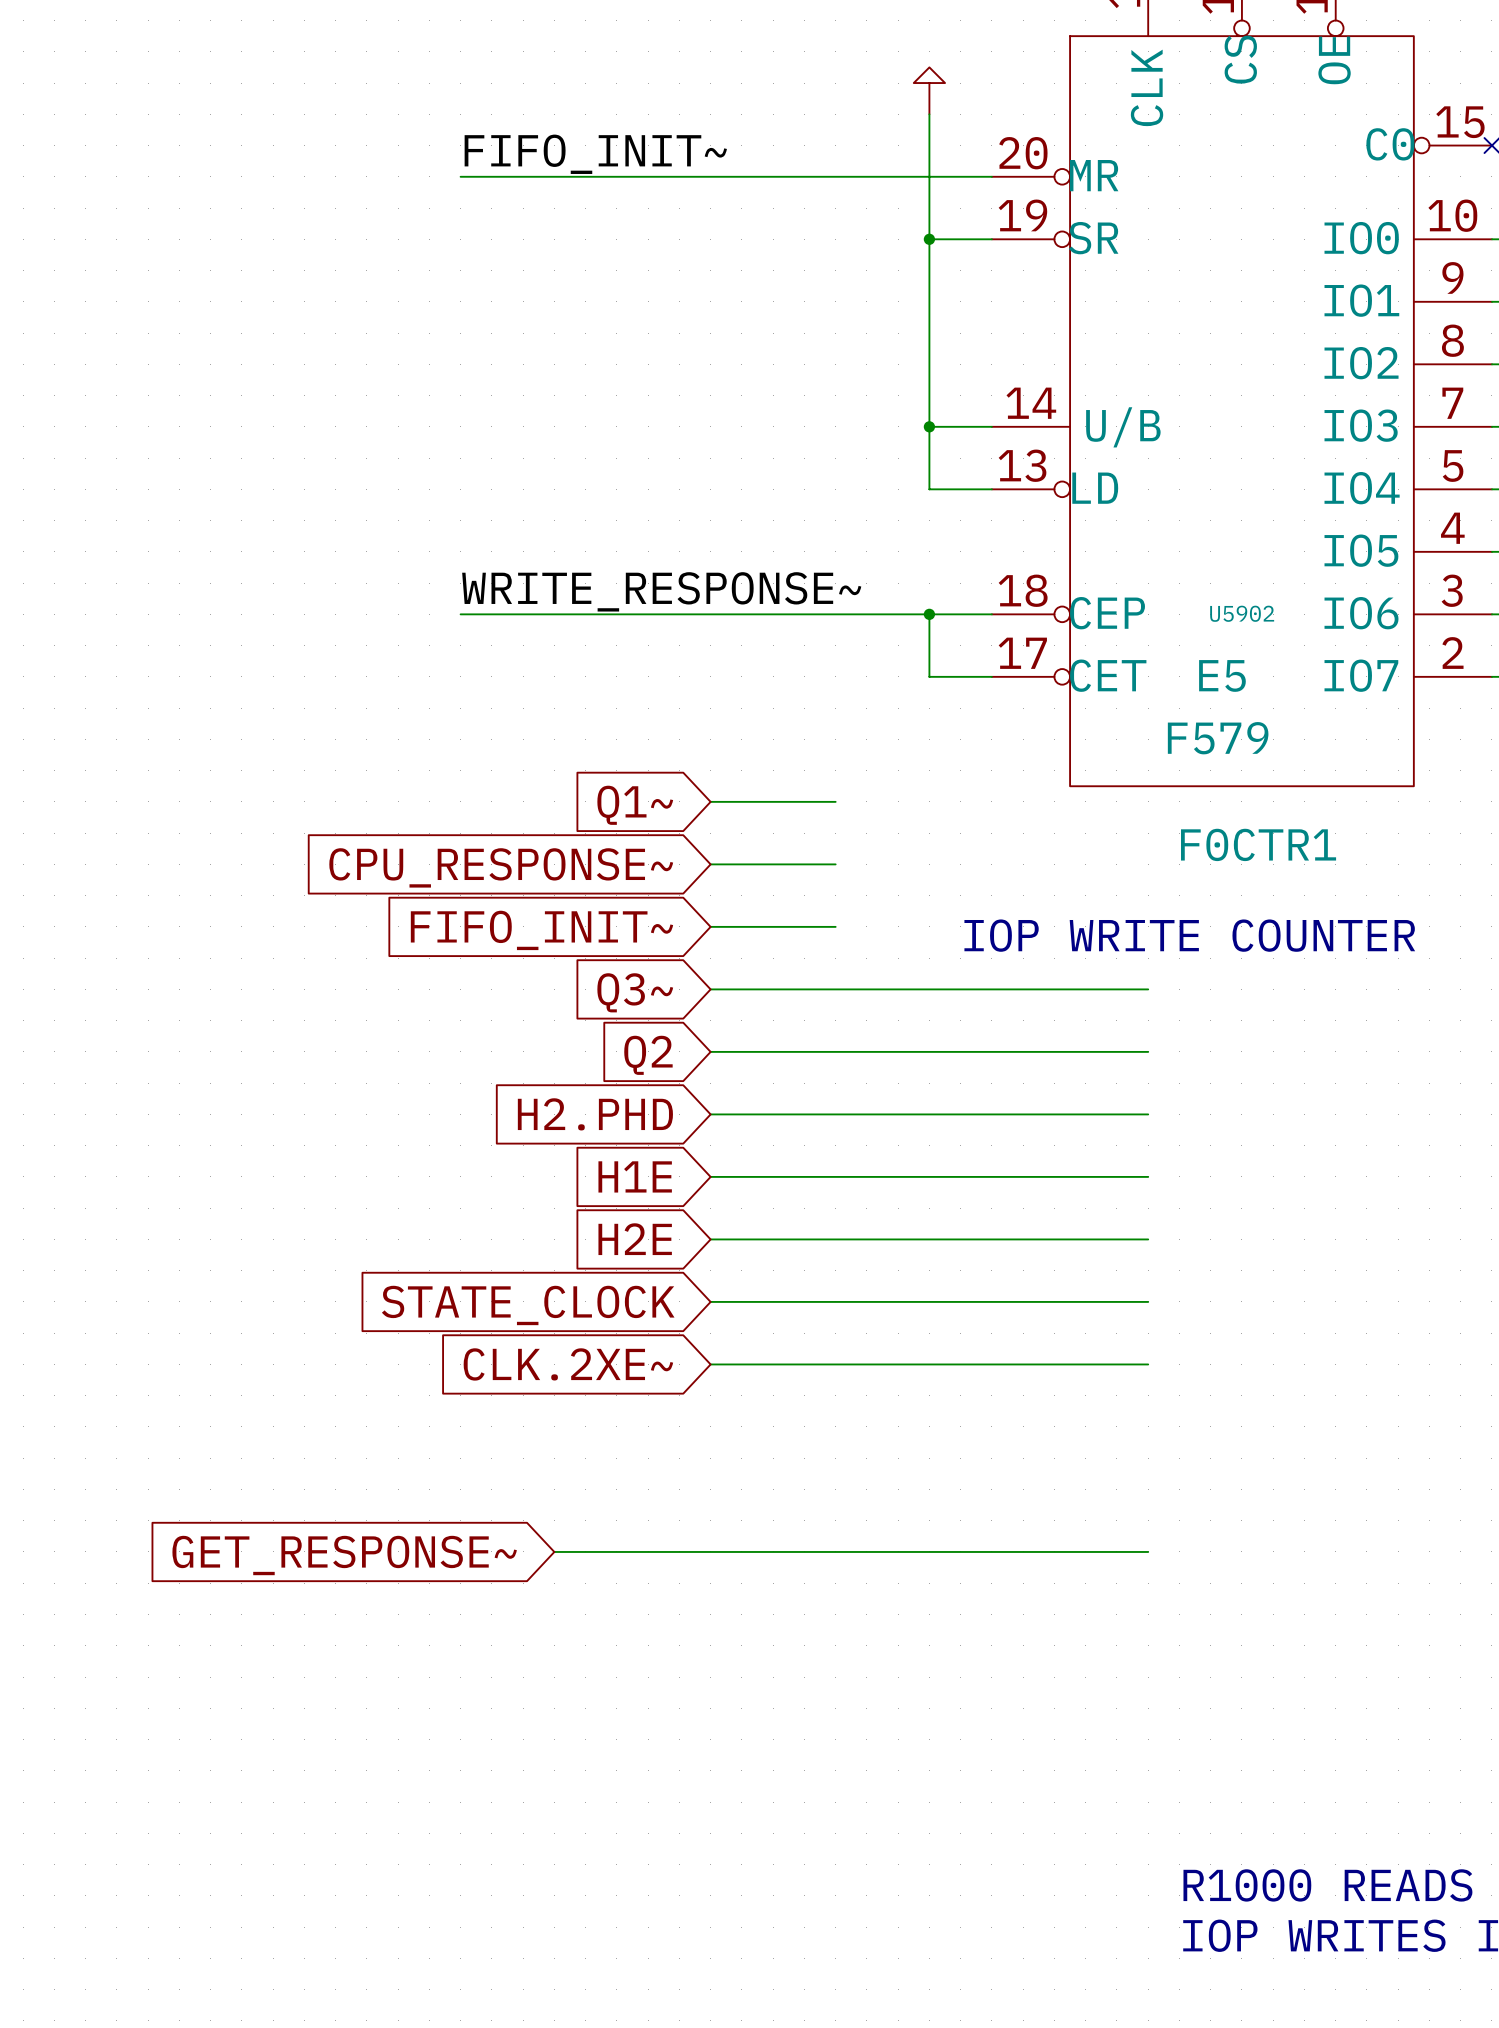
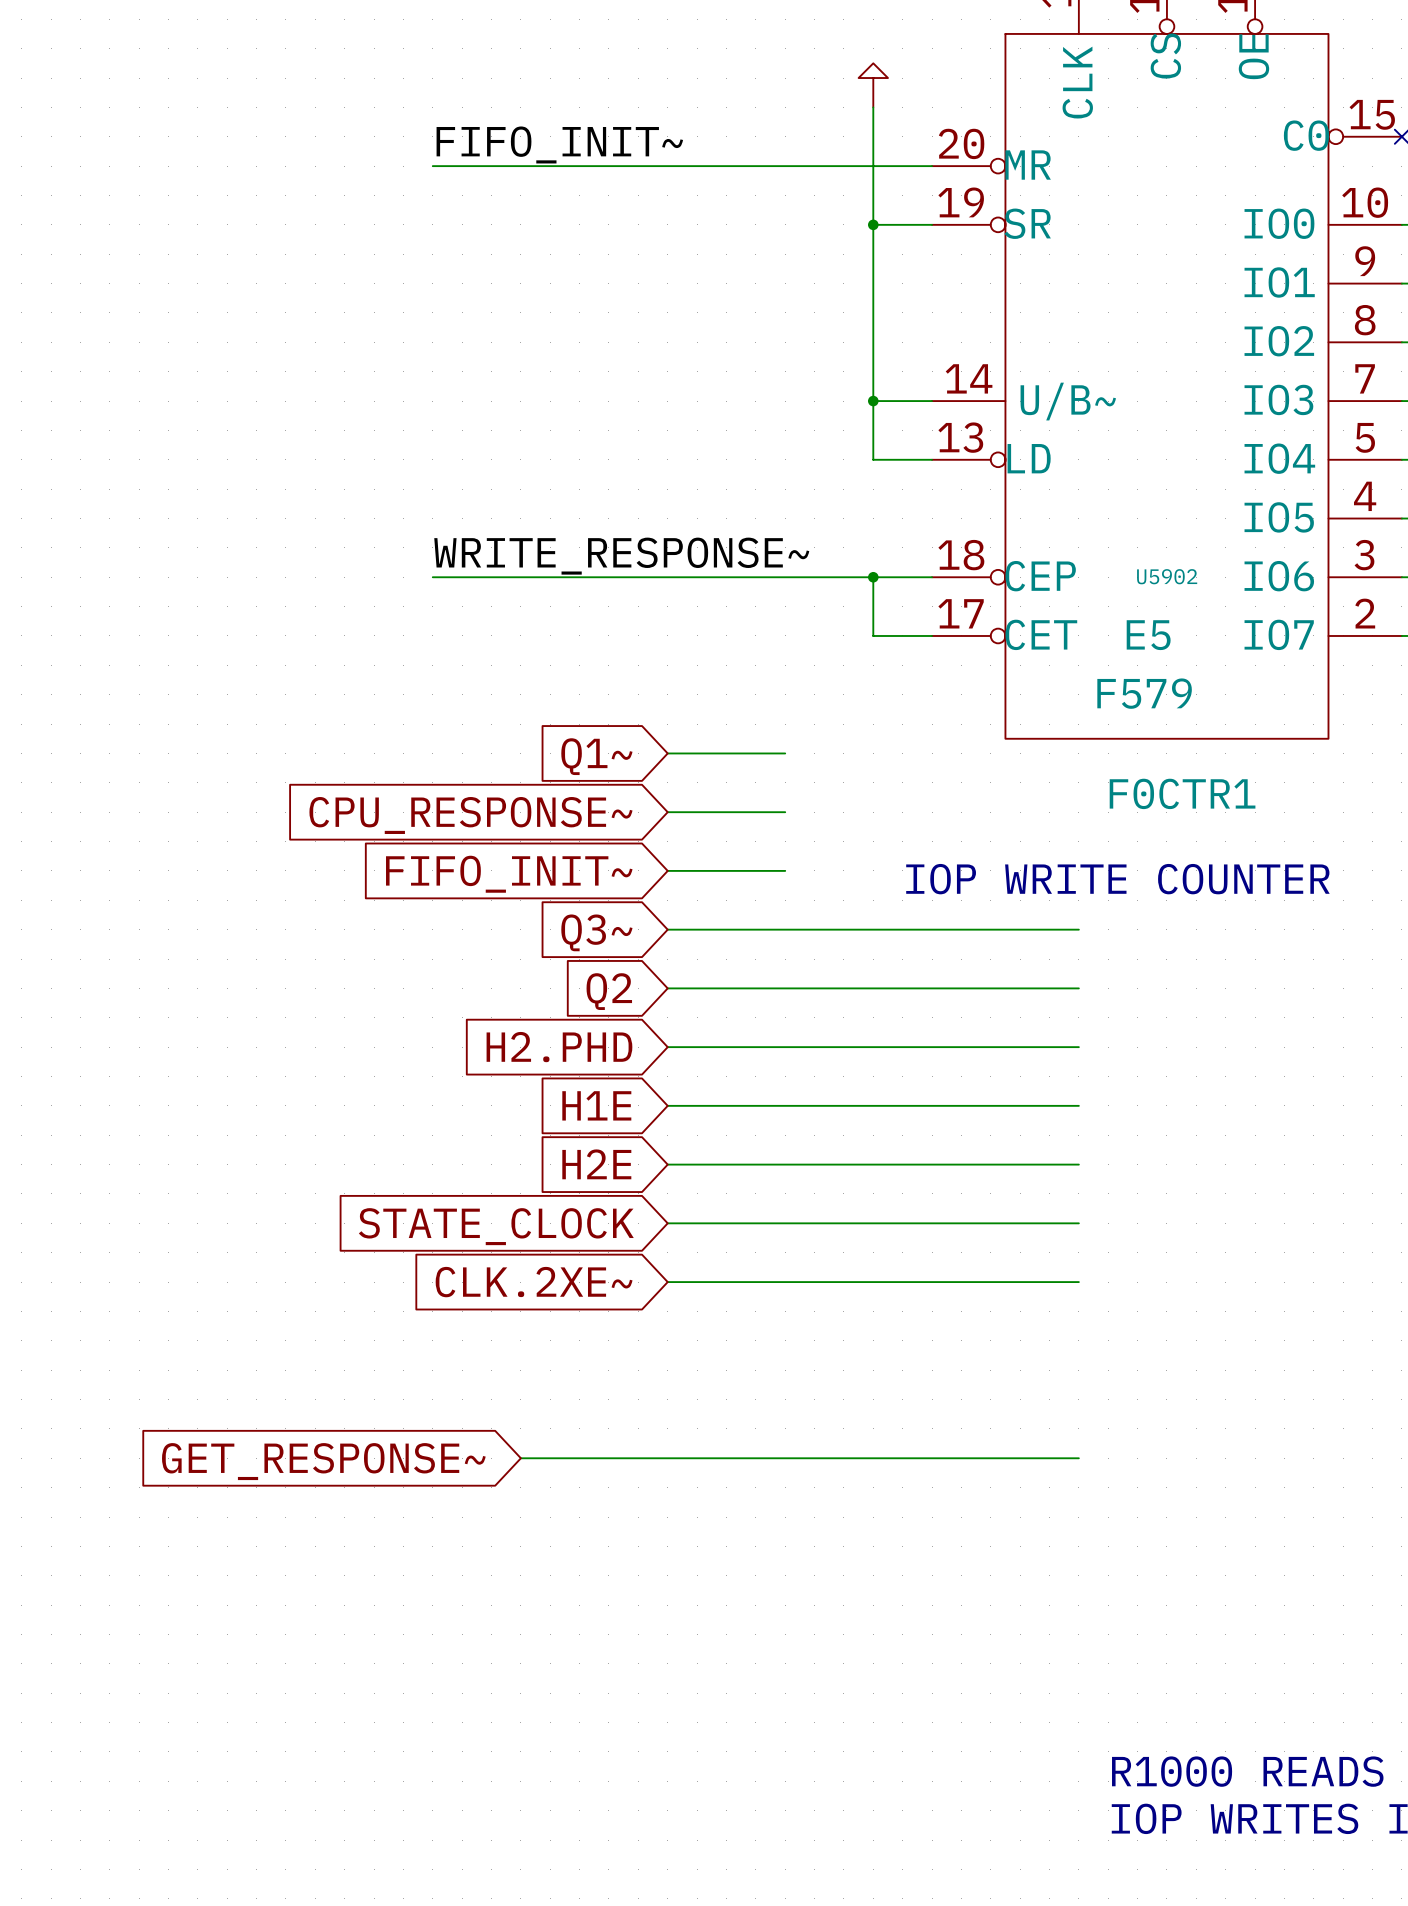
U5902 pin name: U/B (1123, 427) -> U/B~ (1068, 401)

